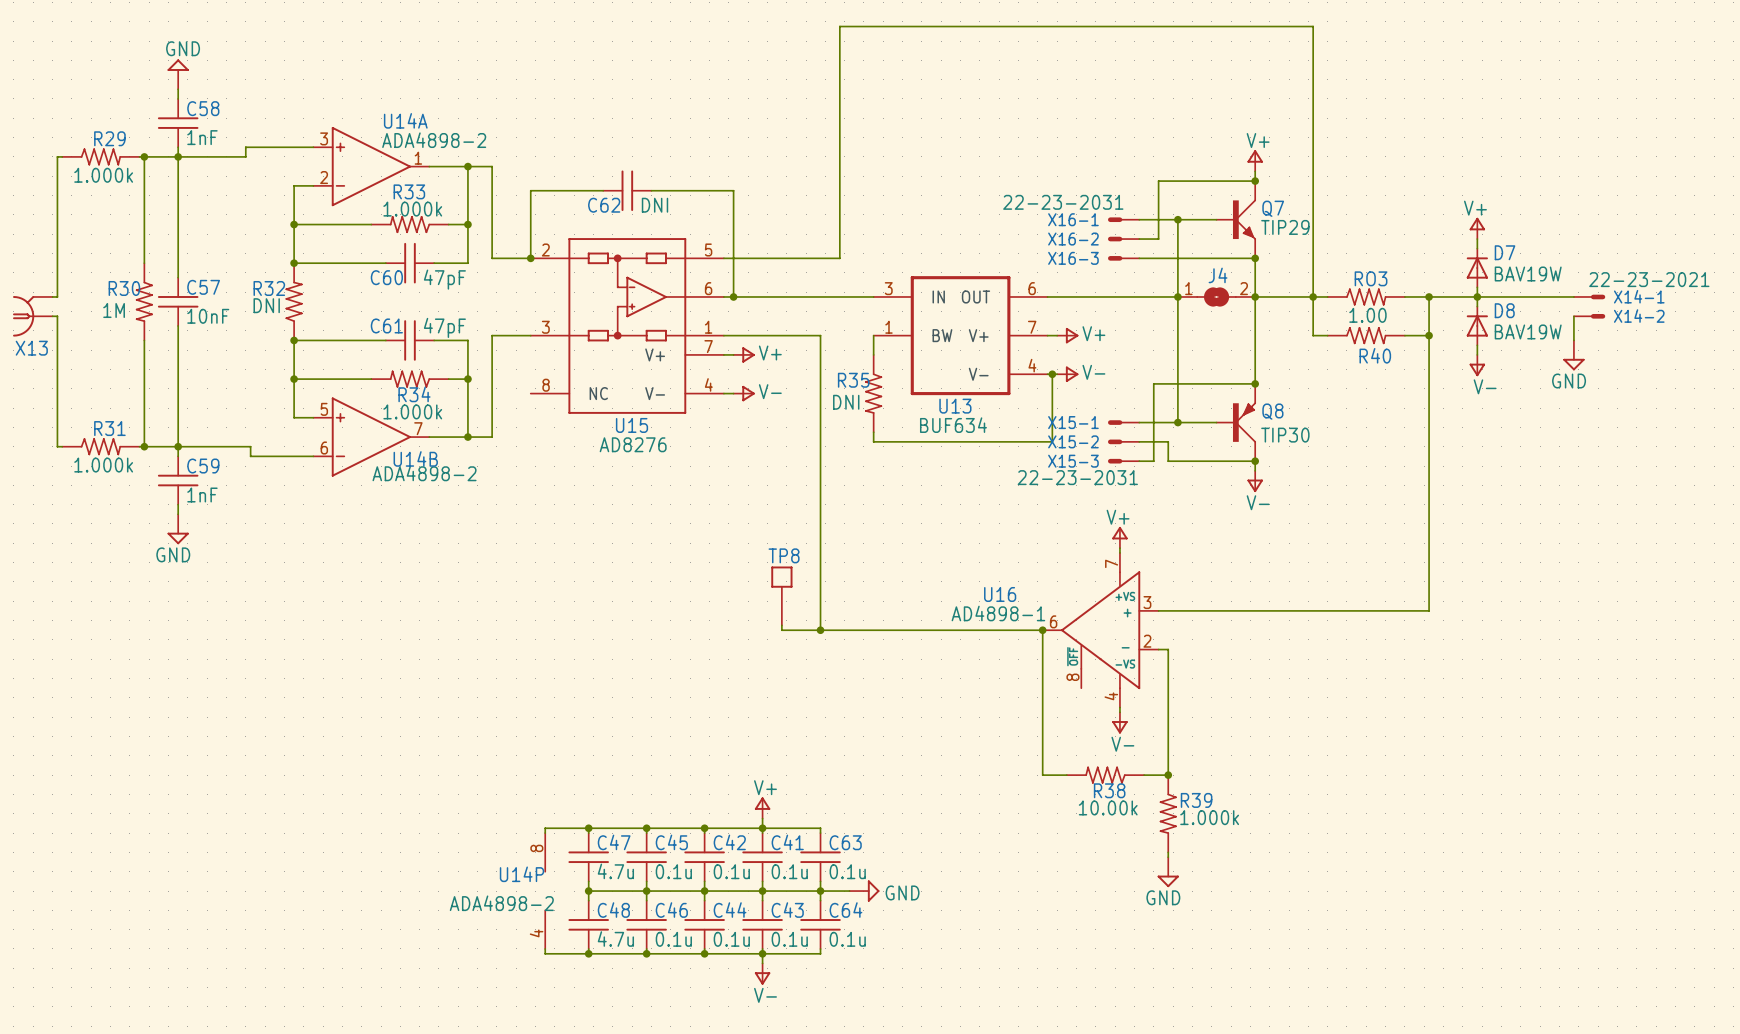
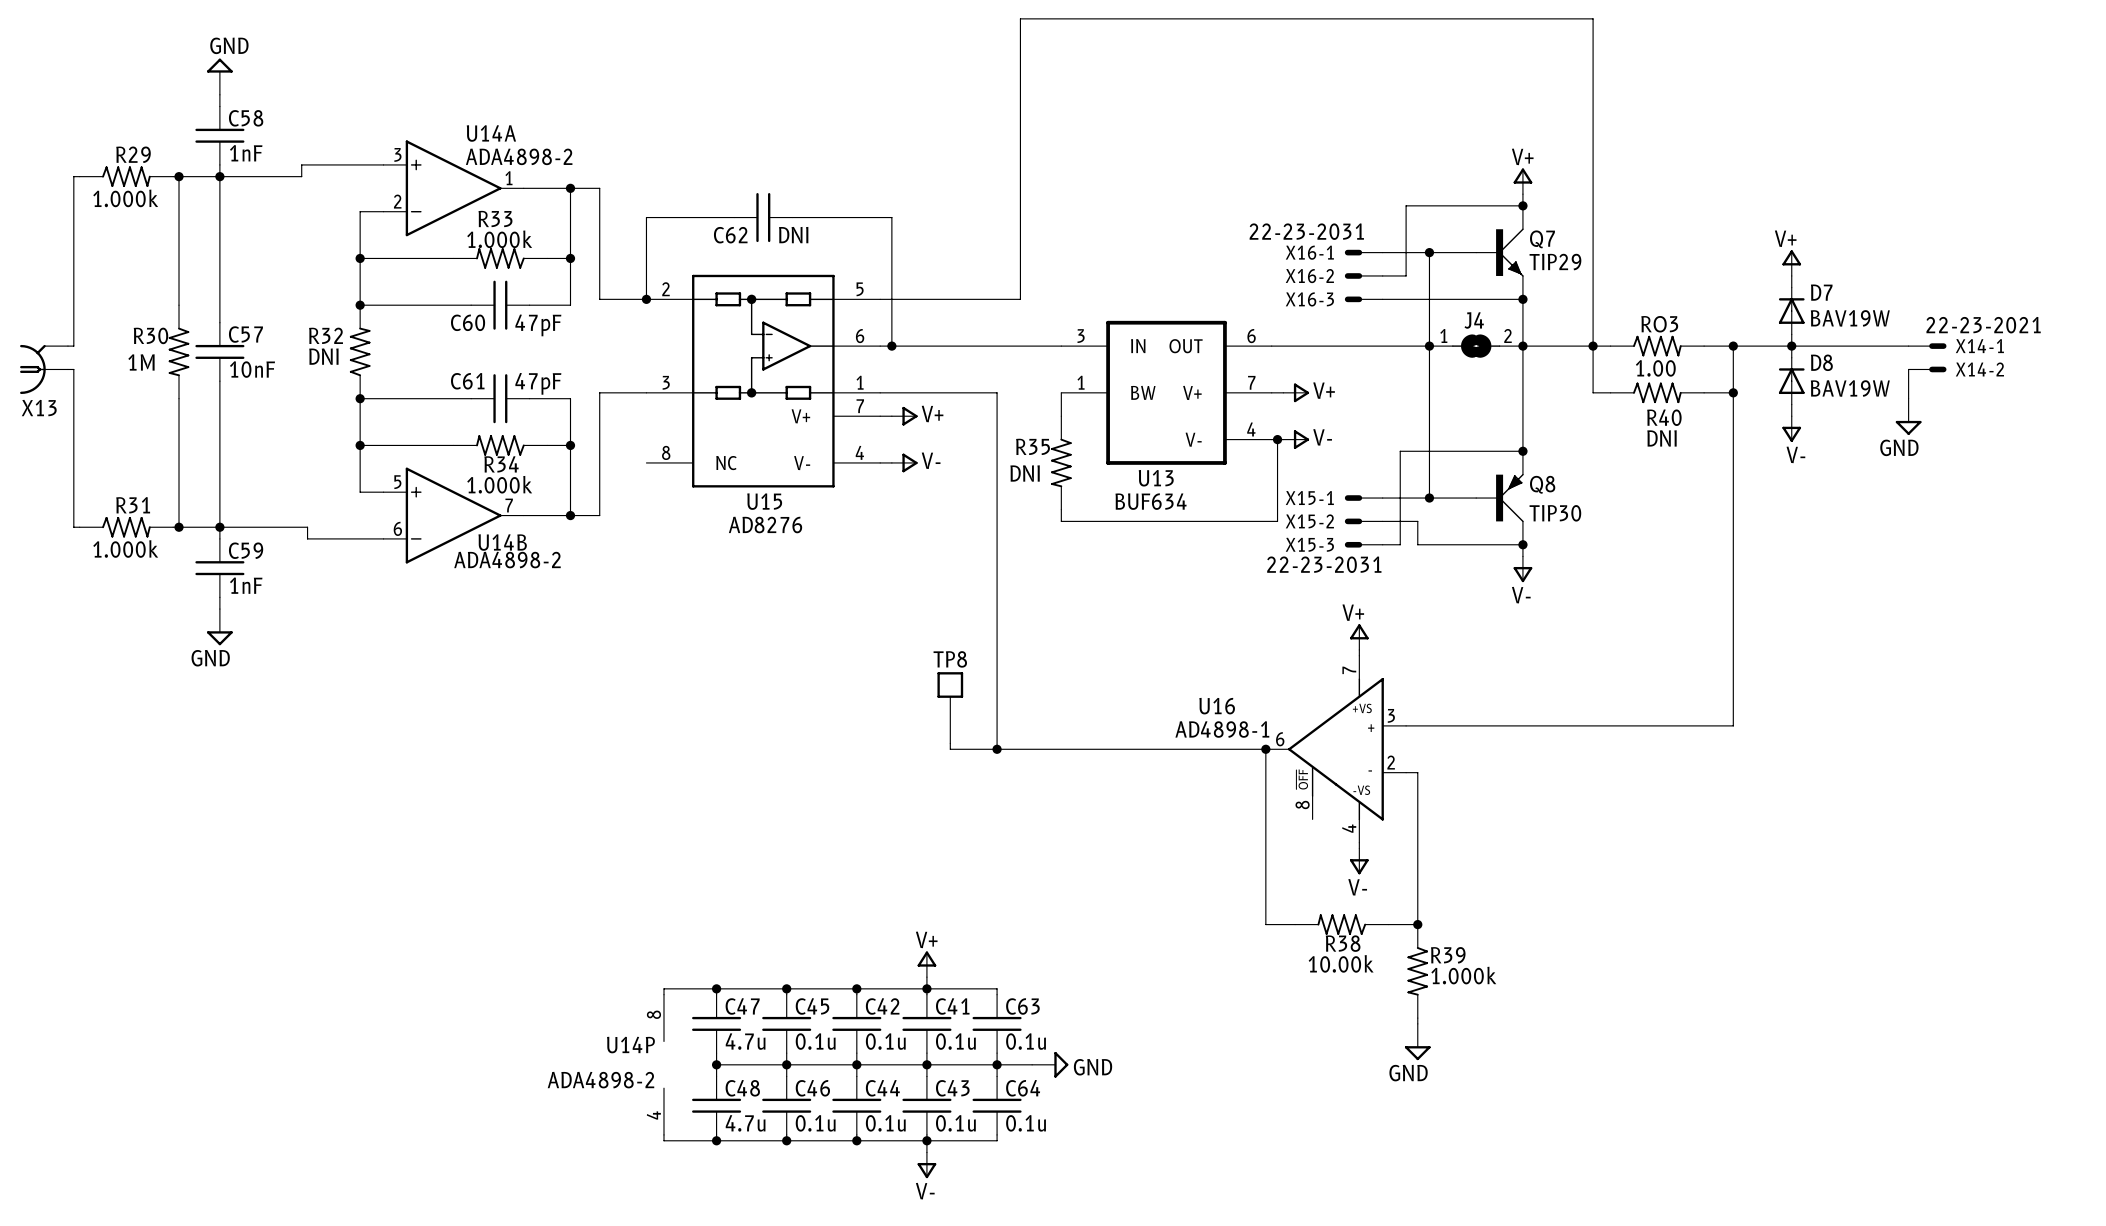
R40 value: none -> DNI (1661, 438)

